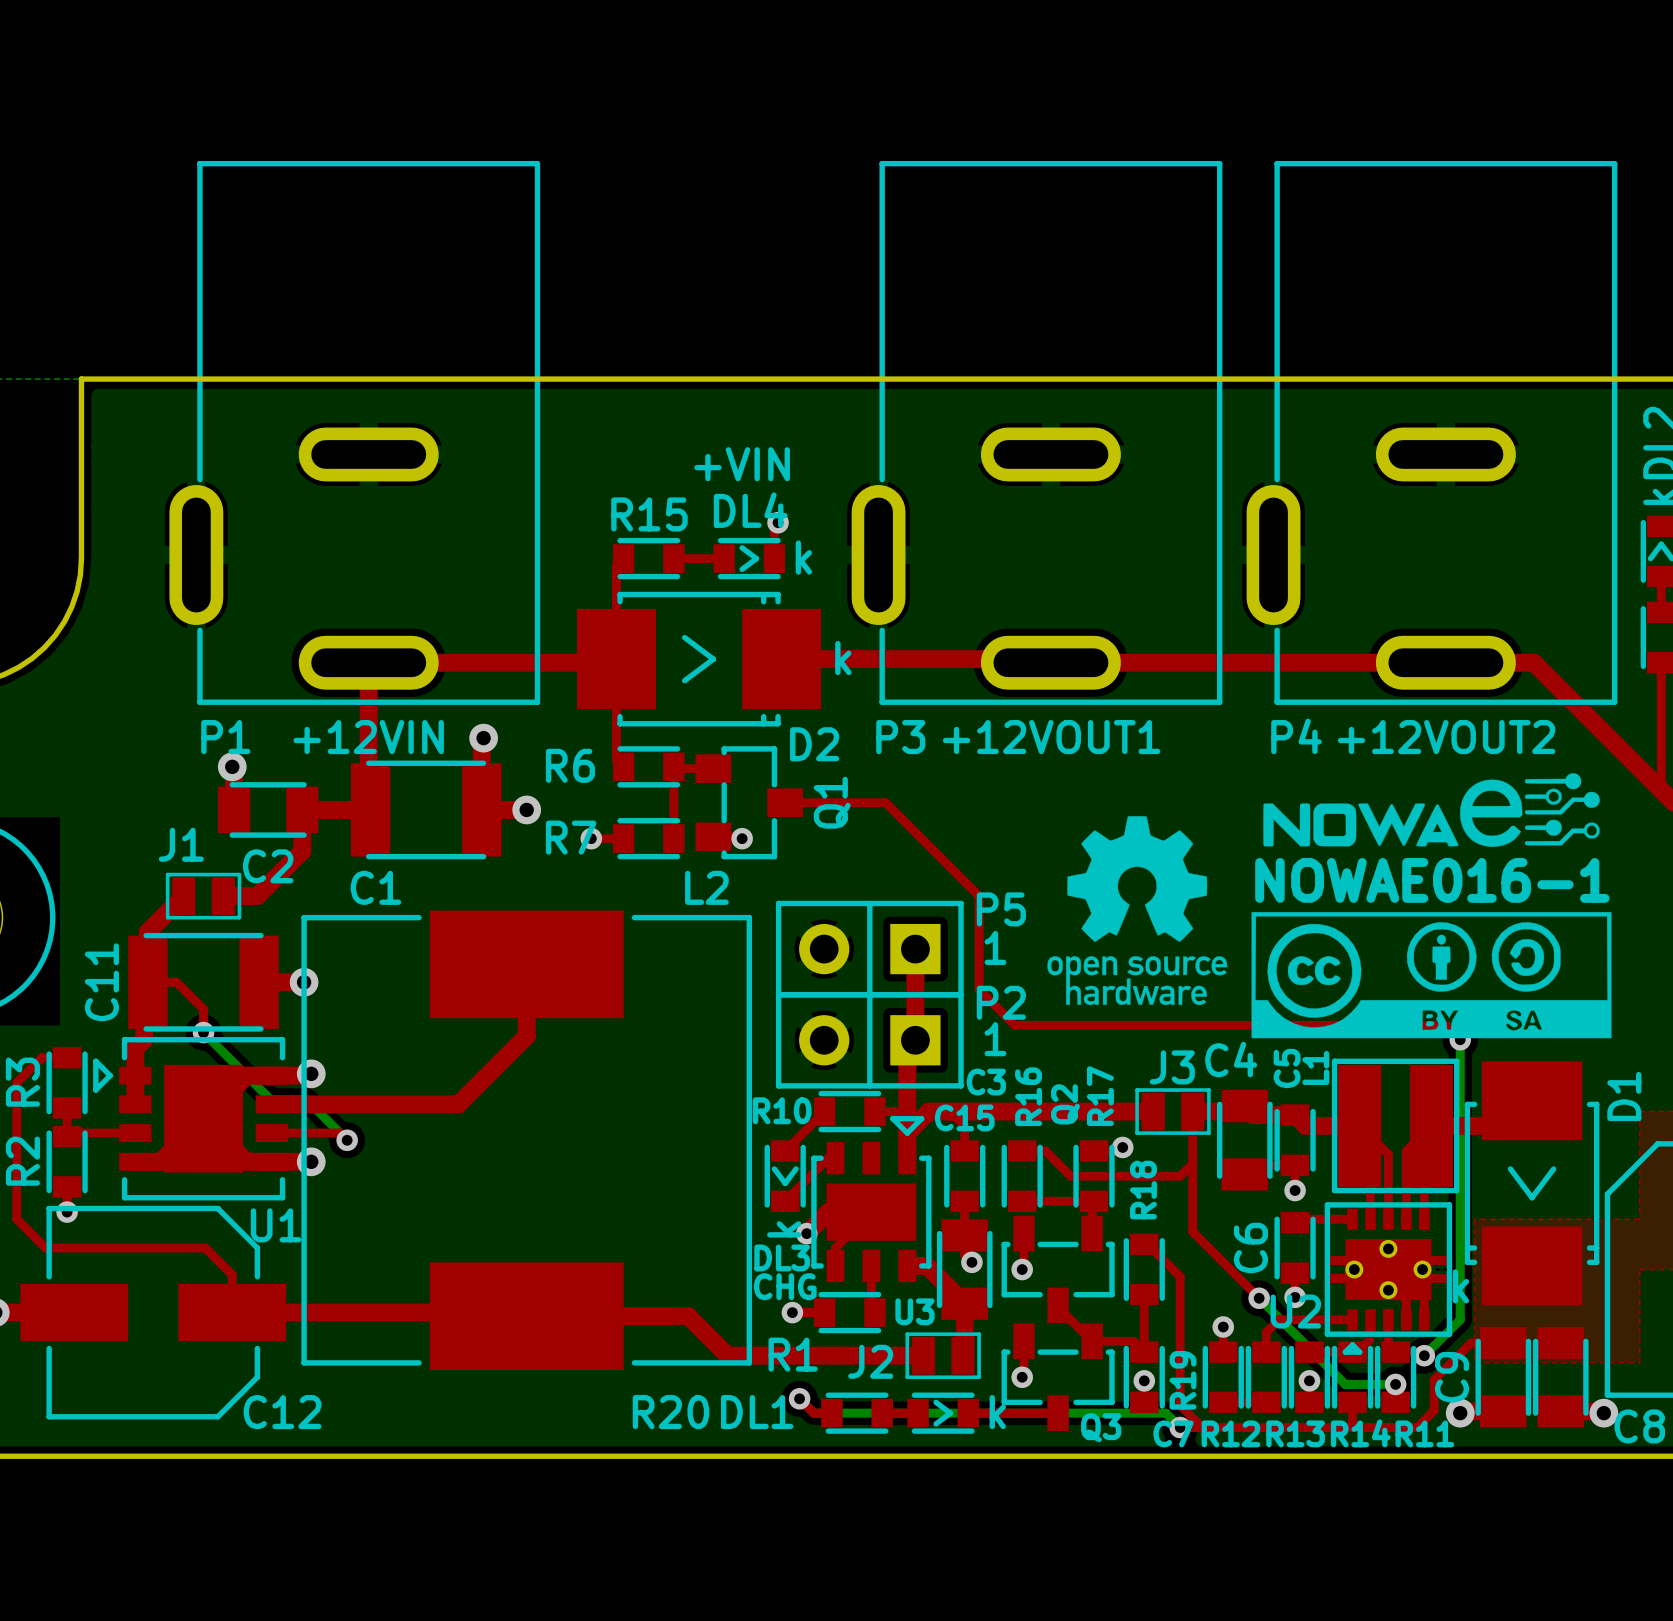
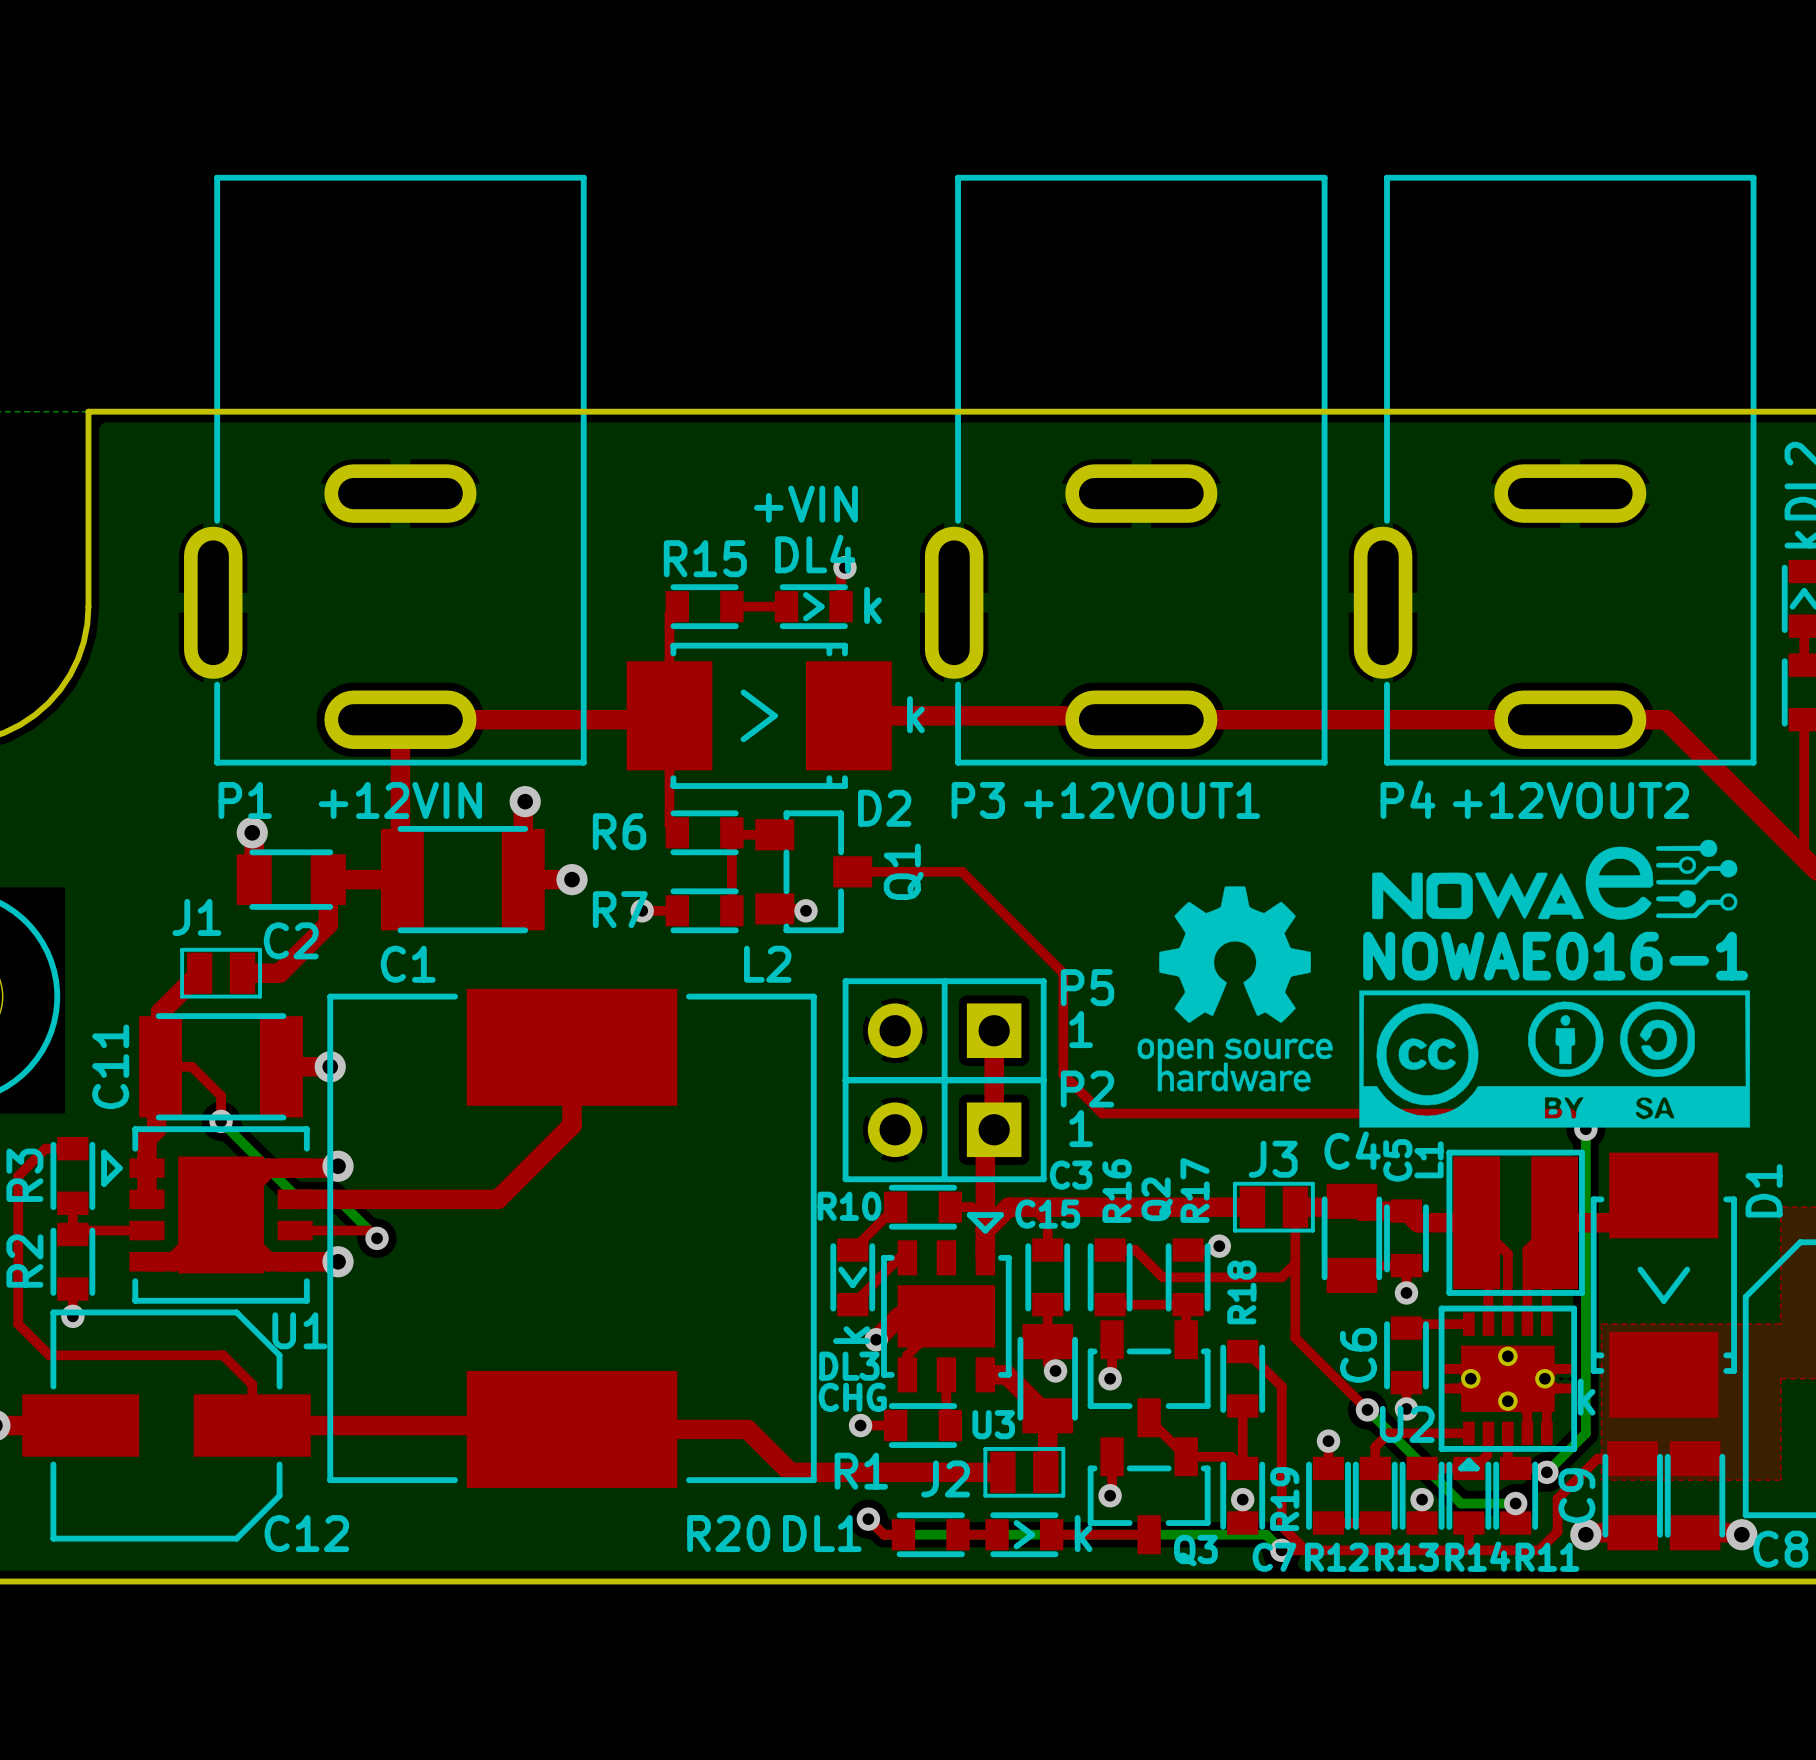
C4 name position: C4 (1231, 1059) -> C4 (1352, 1150)

